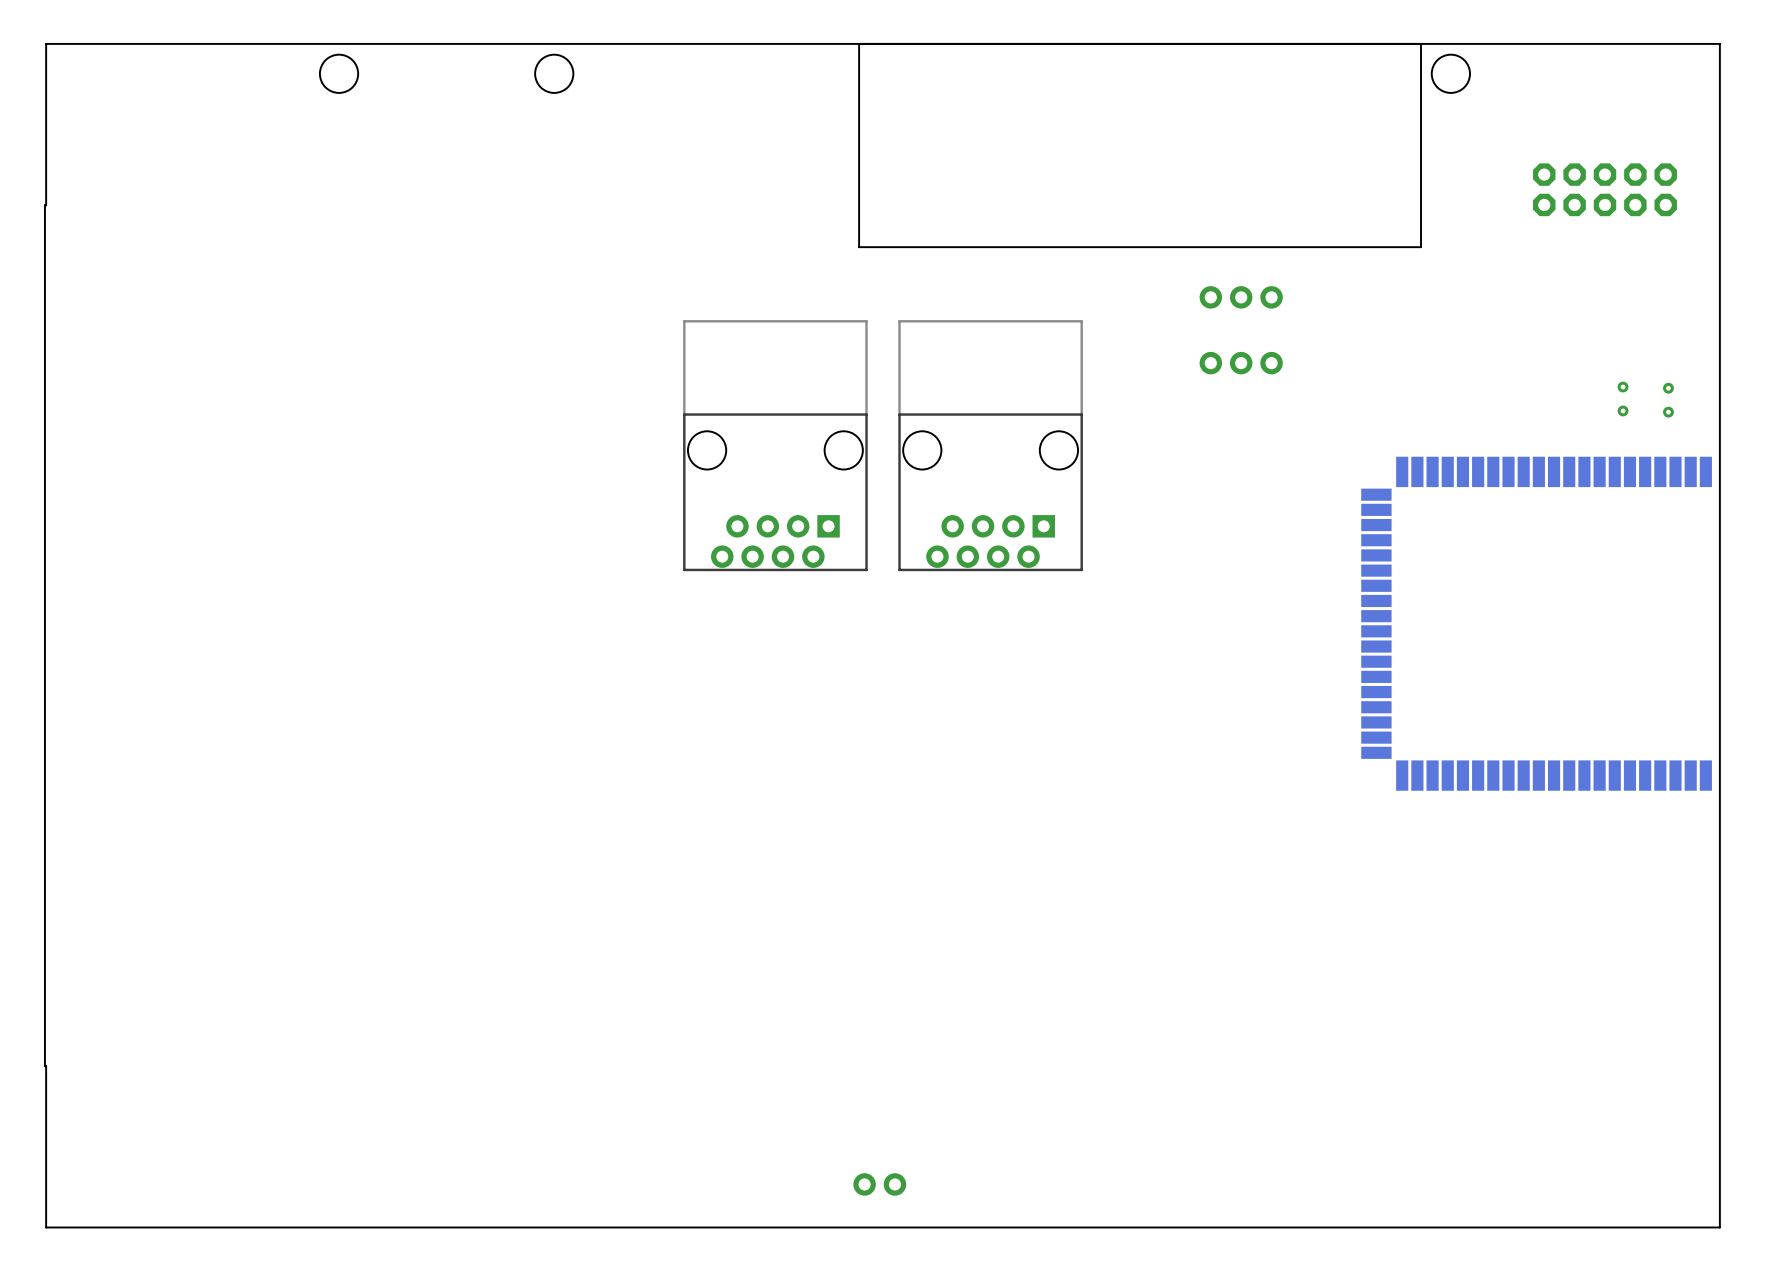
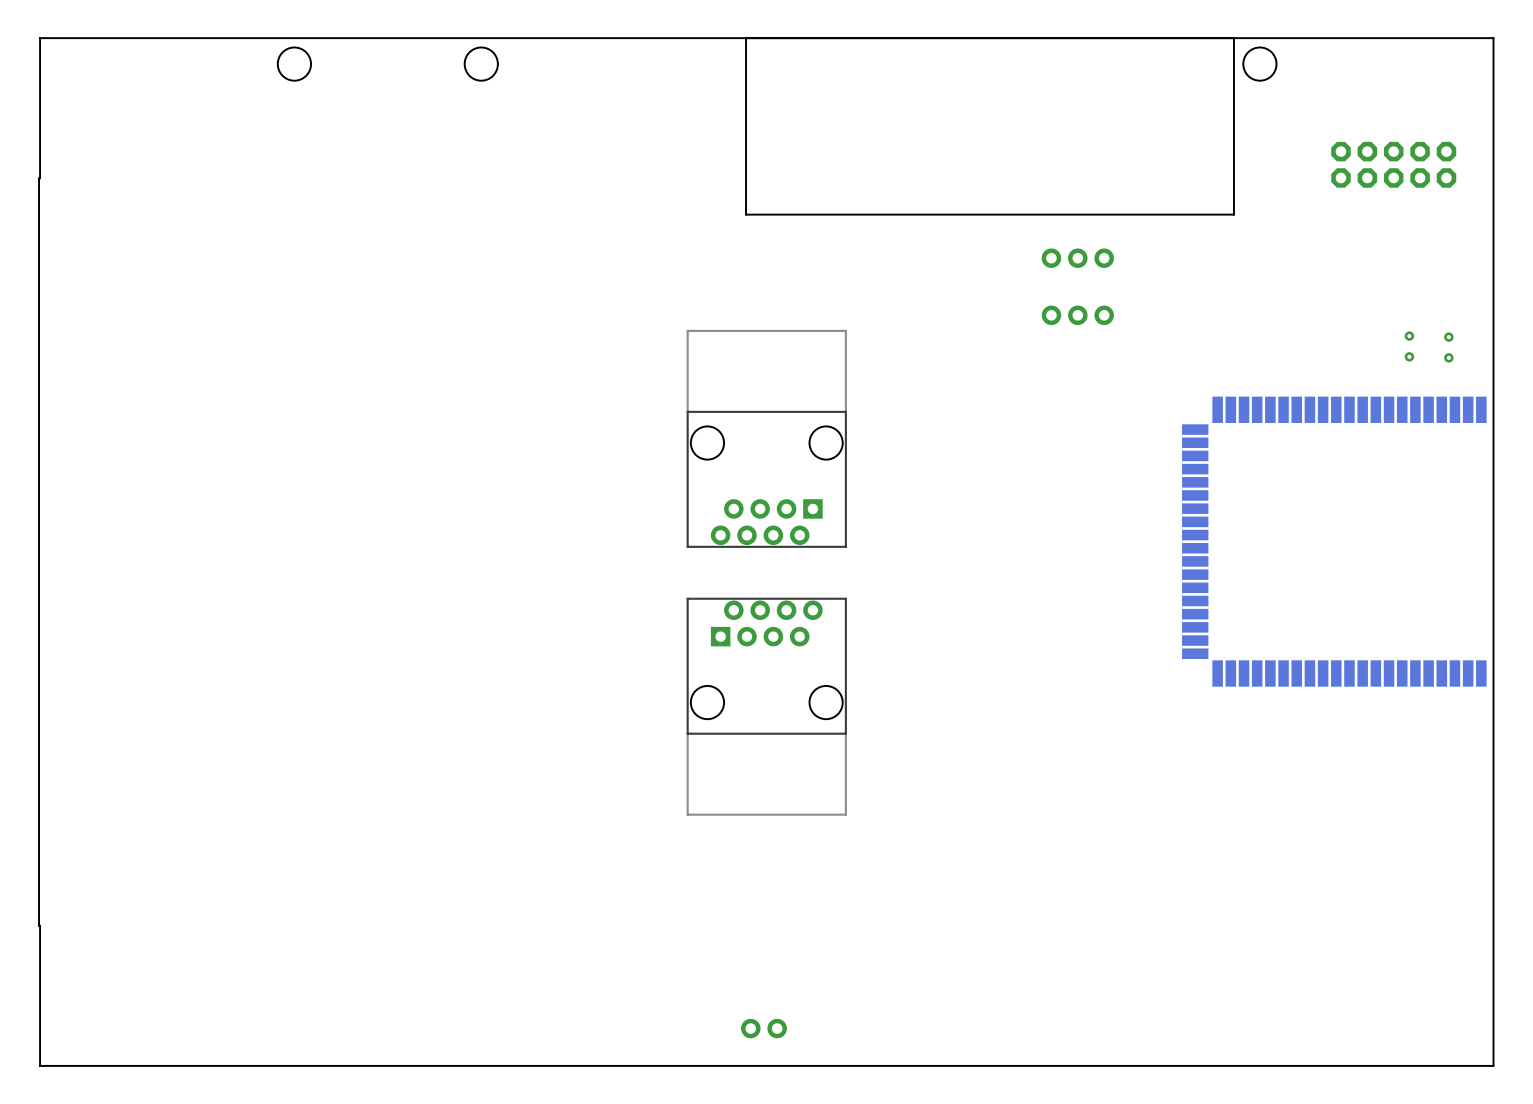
part: (775, 445) -> none
part: (990, 445) -> none
part: none -> (766, 438)
part: none -> (766, 706)

